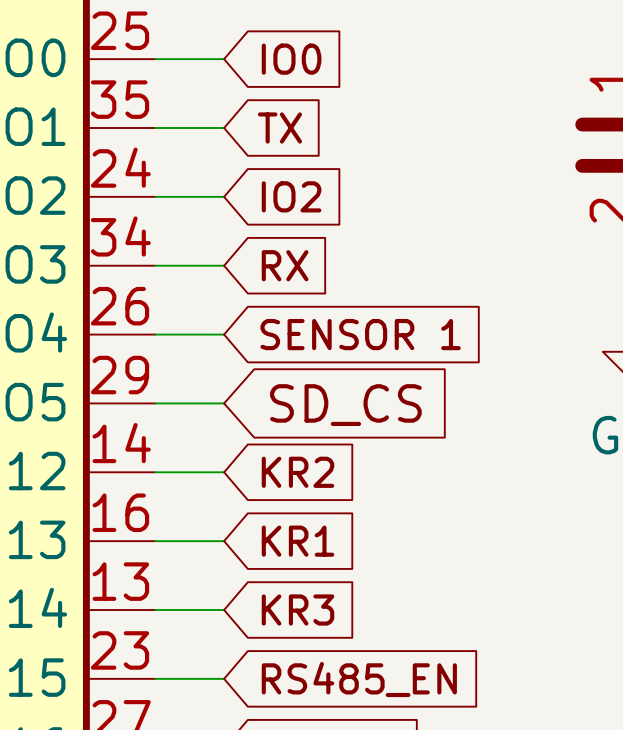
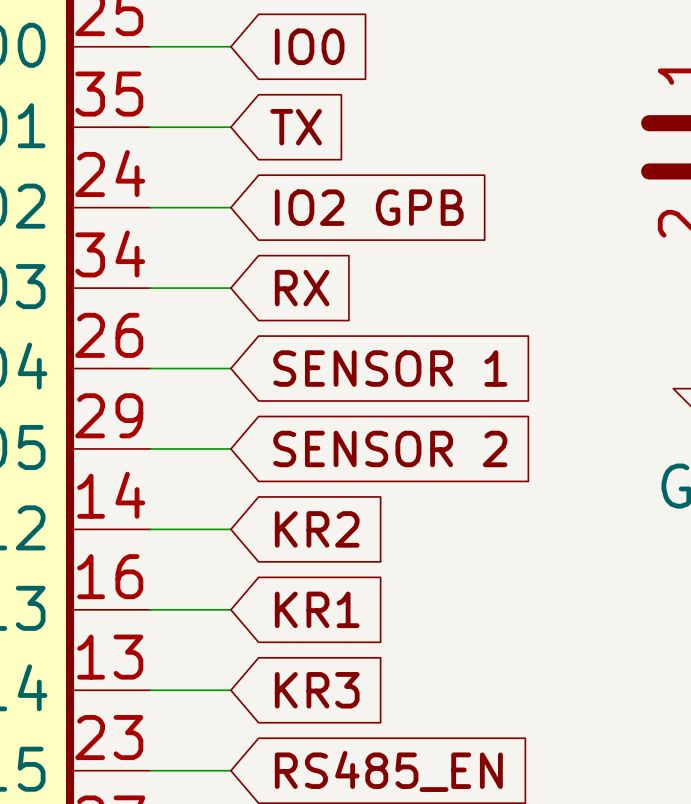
global label: IO2 (291, 196) -> IO2 GPB (369, 207)
global label: SD_CS (345, 405) -> SENSOR 2 (390, 448)

